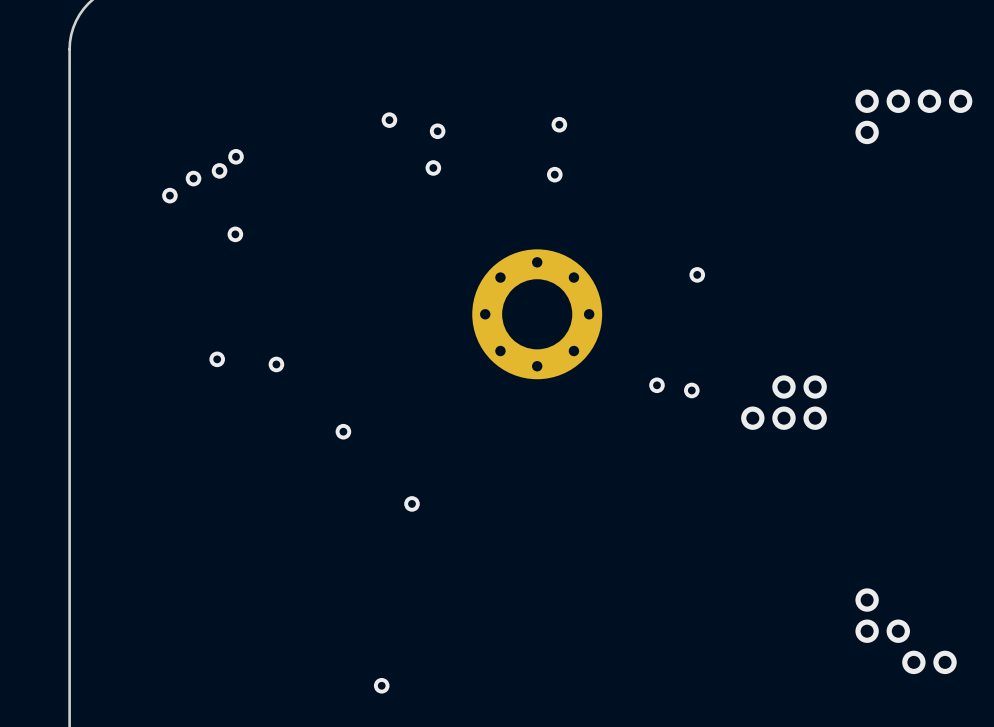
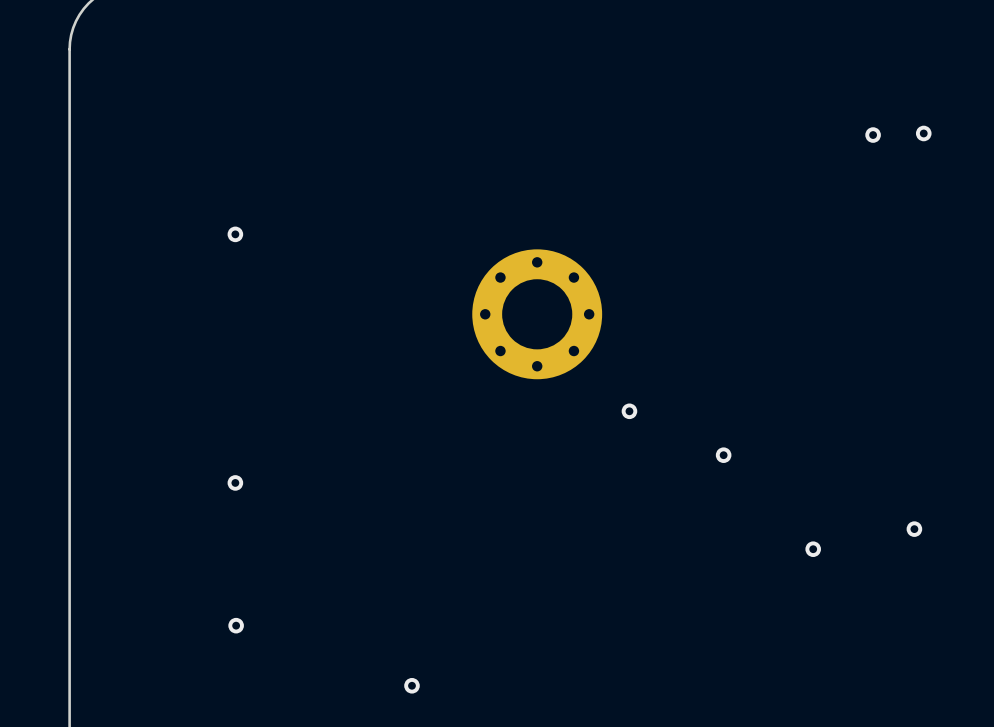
via: (867, 101) -> none
via: (898, 101) -> none
via: (929, 101) -> none
via: (960, 101) -> none
via: (389, 120) -> none
via size: [855, 120, 879, 145] -> [865, 127, 881, 143]
via: (559, 124) -> none
via: (437, 131) -> none
via: none -> (923, 133)
via: (236, 156) -> none
via: (433, 167) -> none
via: (219, 170) -> none
via: (554, 174) -> none
via: (193, 178) -> none
via: (169, 195) -> none
via: (697, 274) -> none
via: (217, 359) -> none
via: (276, 364) -> none
via: (656, 385) -> none
via: (783, 387) -> none
via: (815, 387) -> none
via: (691, 390) -> none
via: none -> (629, 411)
via: (752, 418) -> none
via: (783, 418) -> none
via: (815, 418) -> none
via: (343, 431) -> none
via: none -> (723, 455)
via: none -> (235, 482)
via: (411, 503) -> none
via: none -> (914, 529)
via: none -> (813, 549)
via: (867, 600) -> none
via: none -> (236, 625)
via: (867, 631) -> none
via: (898, 631) -> none
via: (913, 662) -> none
via: (945, 662) -> none
via position: (381, 685) -> (411, 685)

